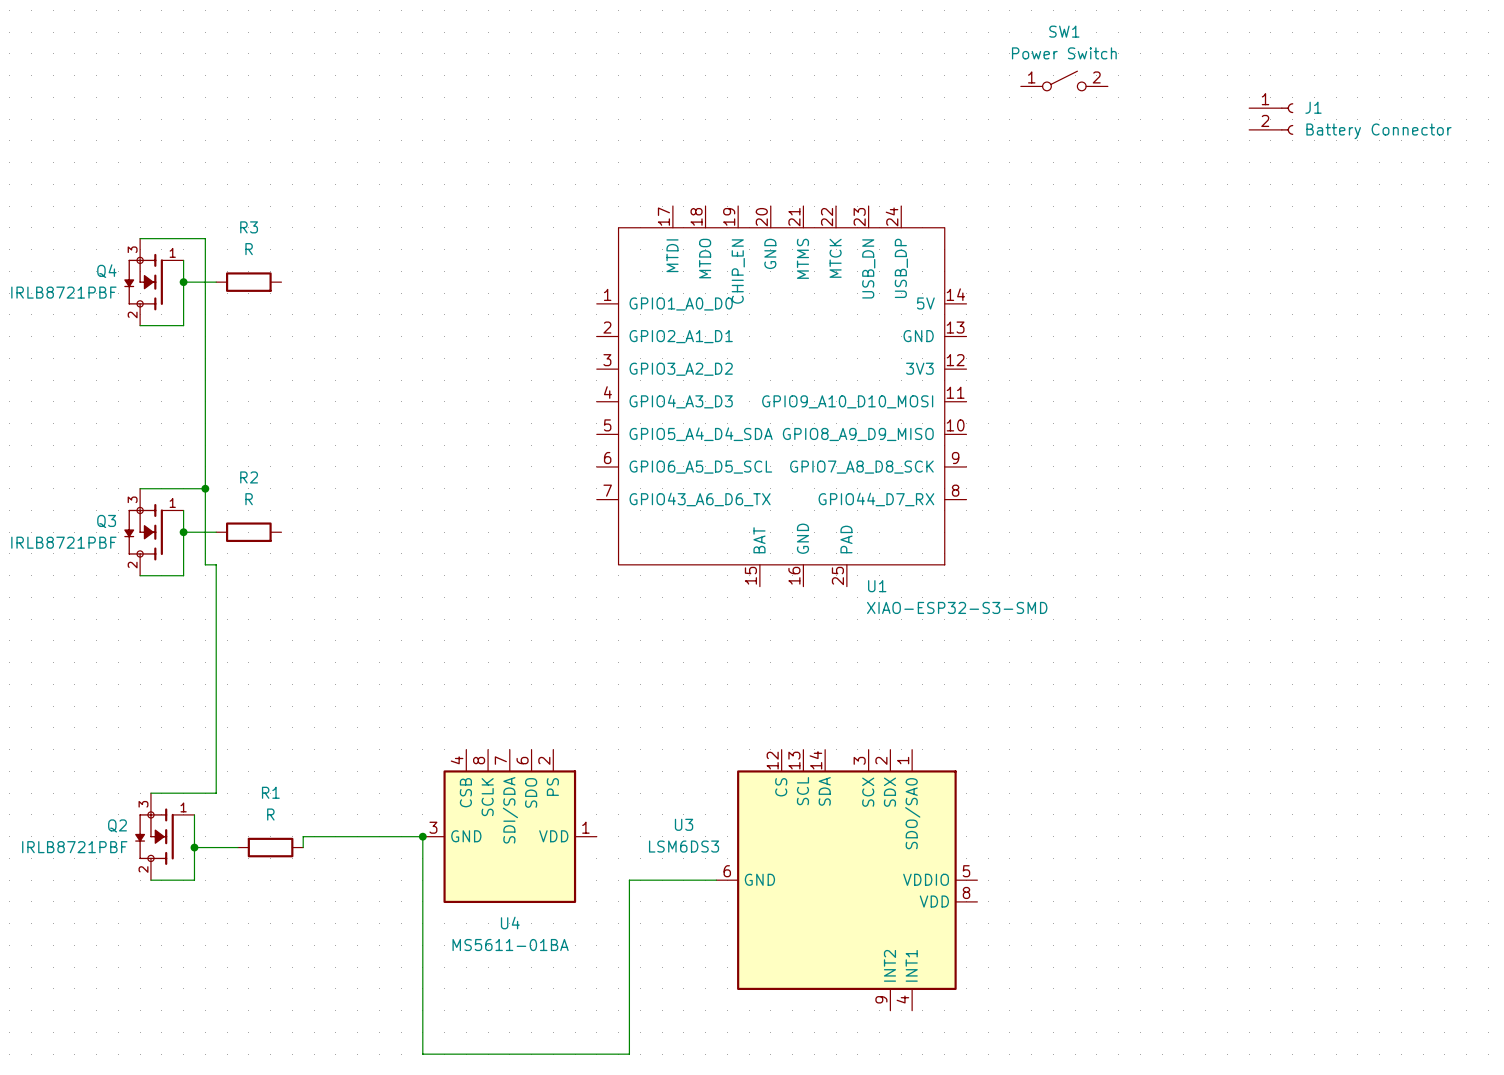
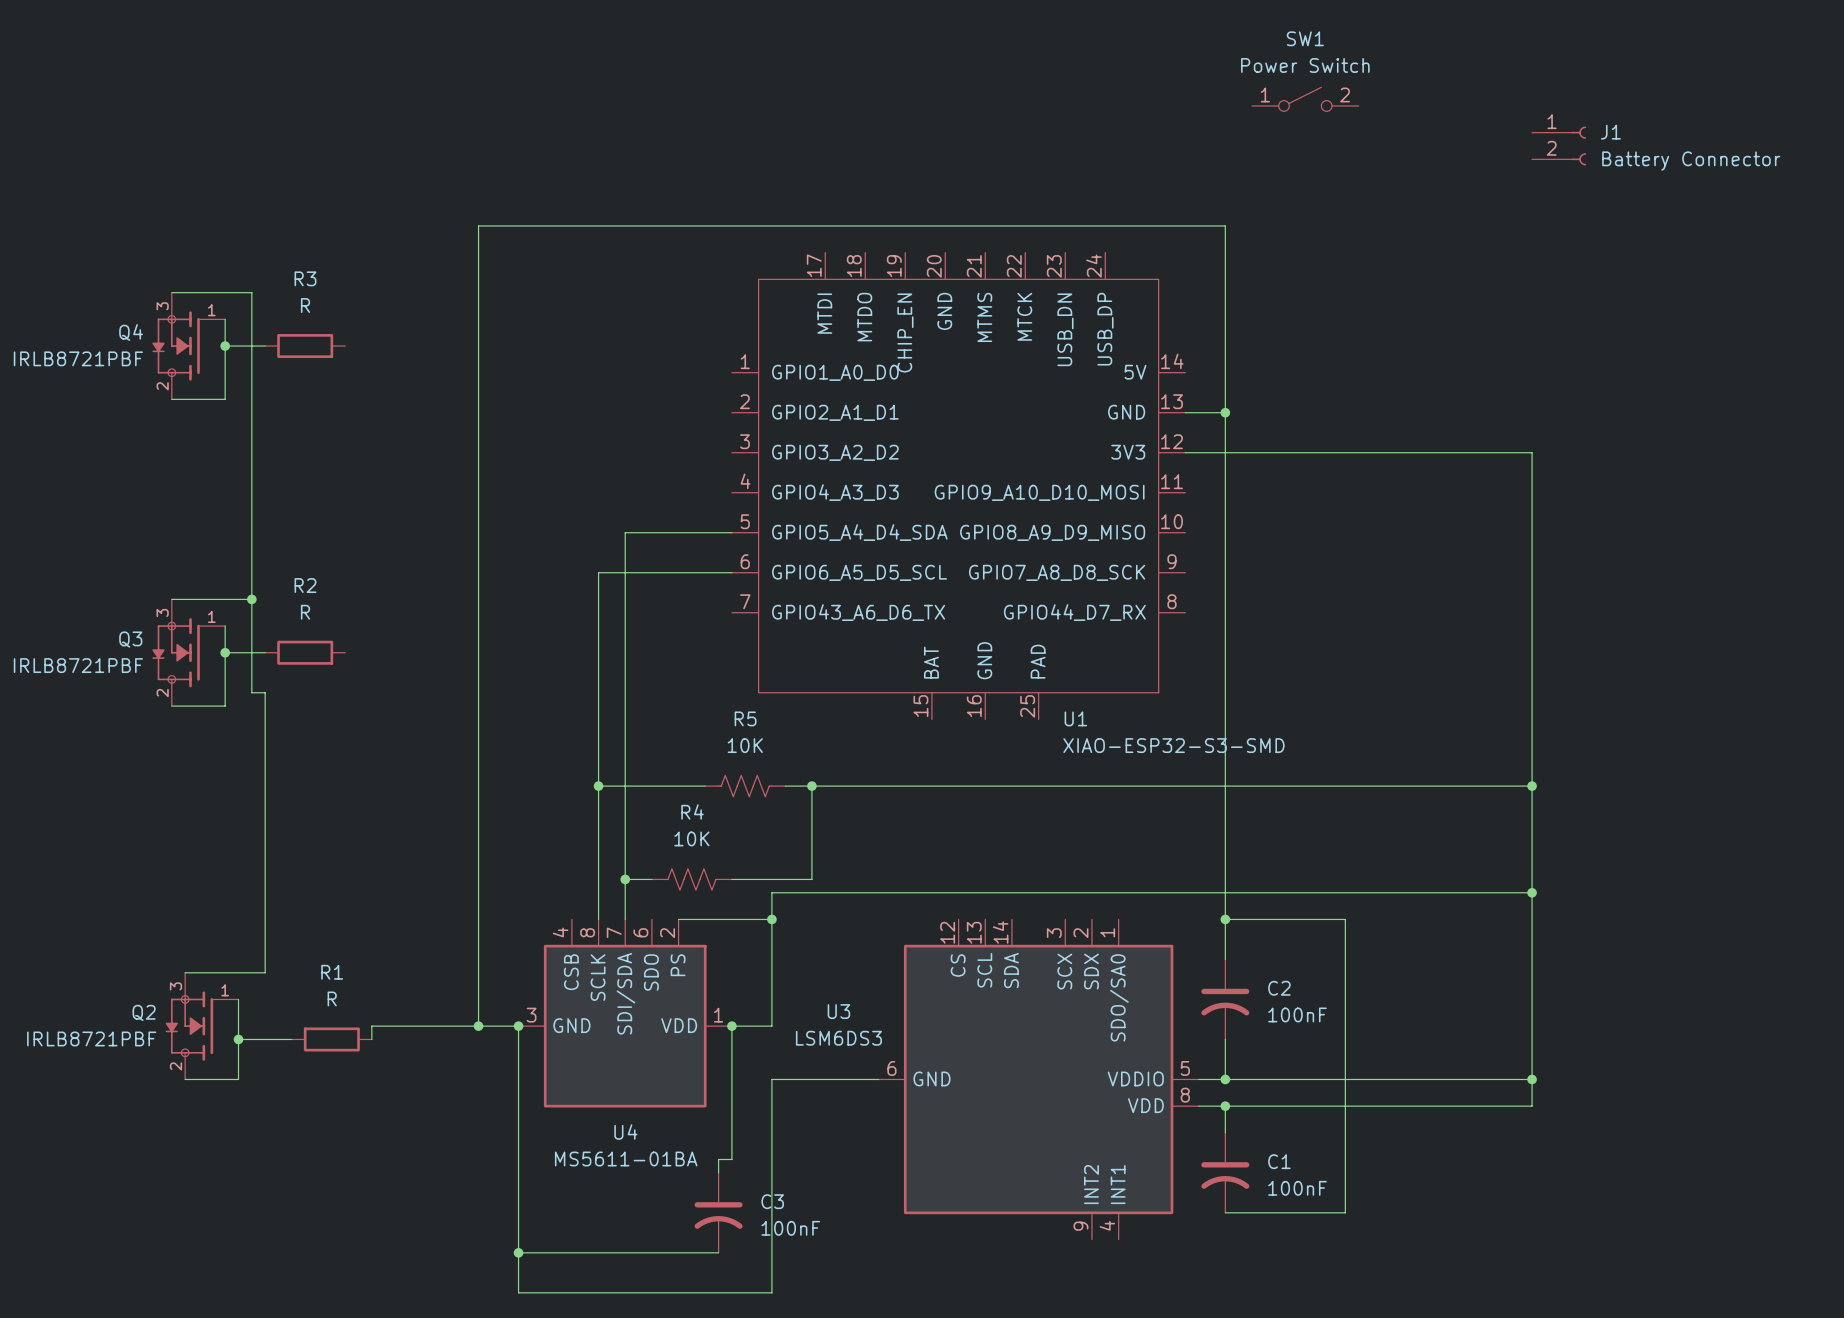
wire: none -> (1185, 412) (1225, 412)
junction: none -> (1225, 412)
wire: none -> (1185, 452) (1532, 452) (1532, 1106) (1198, 1106)
wire: none -> (731, 532) (625, 532) (625, 919)
wire: none -> (731, 572) (598, 572) (598, 919)
wire: none -> (598, 786) (705, 786)
junction: none -> (598, 786)
R5: none -> 10K (745, 786)
wire: none -> (785, 786) (1532, 786)
wire: none -> (811, 786) (811, 879) (731, 879)
junction: none -> (811, 786)
junction: none -> (1532, 786)
wire: none -> (625, 879) (651, 879)
junction: none -> (625, 879)
R4: none -> 10K (691, 879)
wire: none -> (1532, 892) (771, 892) (771, 1026) (731, 1026) (731, 1159) (718, 1159) (718, 1172)
junction: none -> (1532, 892)
wire: none -> (678, 919) (771, 919)
junction: none -> (771, 919)
wire: none -> (1225, 919) (1345, 919) (1345, 1212) (1225, 1212)
junction: none -> (1225, 919)
wire: none -> (1225, 959) (1225, 226) (478, 226) (478, 1026)
C2: none -> 100nF (1225, 999)
junction: none -> (478, 1026)
junction: none -> (731, 1026)
wire: none -> (1225, 1039) (1225, 1079)
wire: none -> (1198, 1079) (1532, 1079)
junction: none -> (1225, 1079)
junction: none -> (1532, 1079)
wire: none -> (1225, 1106) (1225, 1132)
junction: none -> (1225, 1106)
C1: none -> 100nF (1225, 1172)
C3: none -> 100nF (718, 1212)
wire: none -> (518, 1252) (718, 1252)
junction: none -> (518, 1252)

